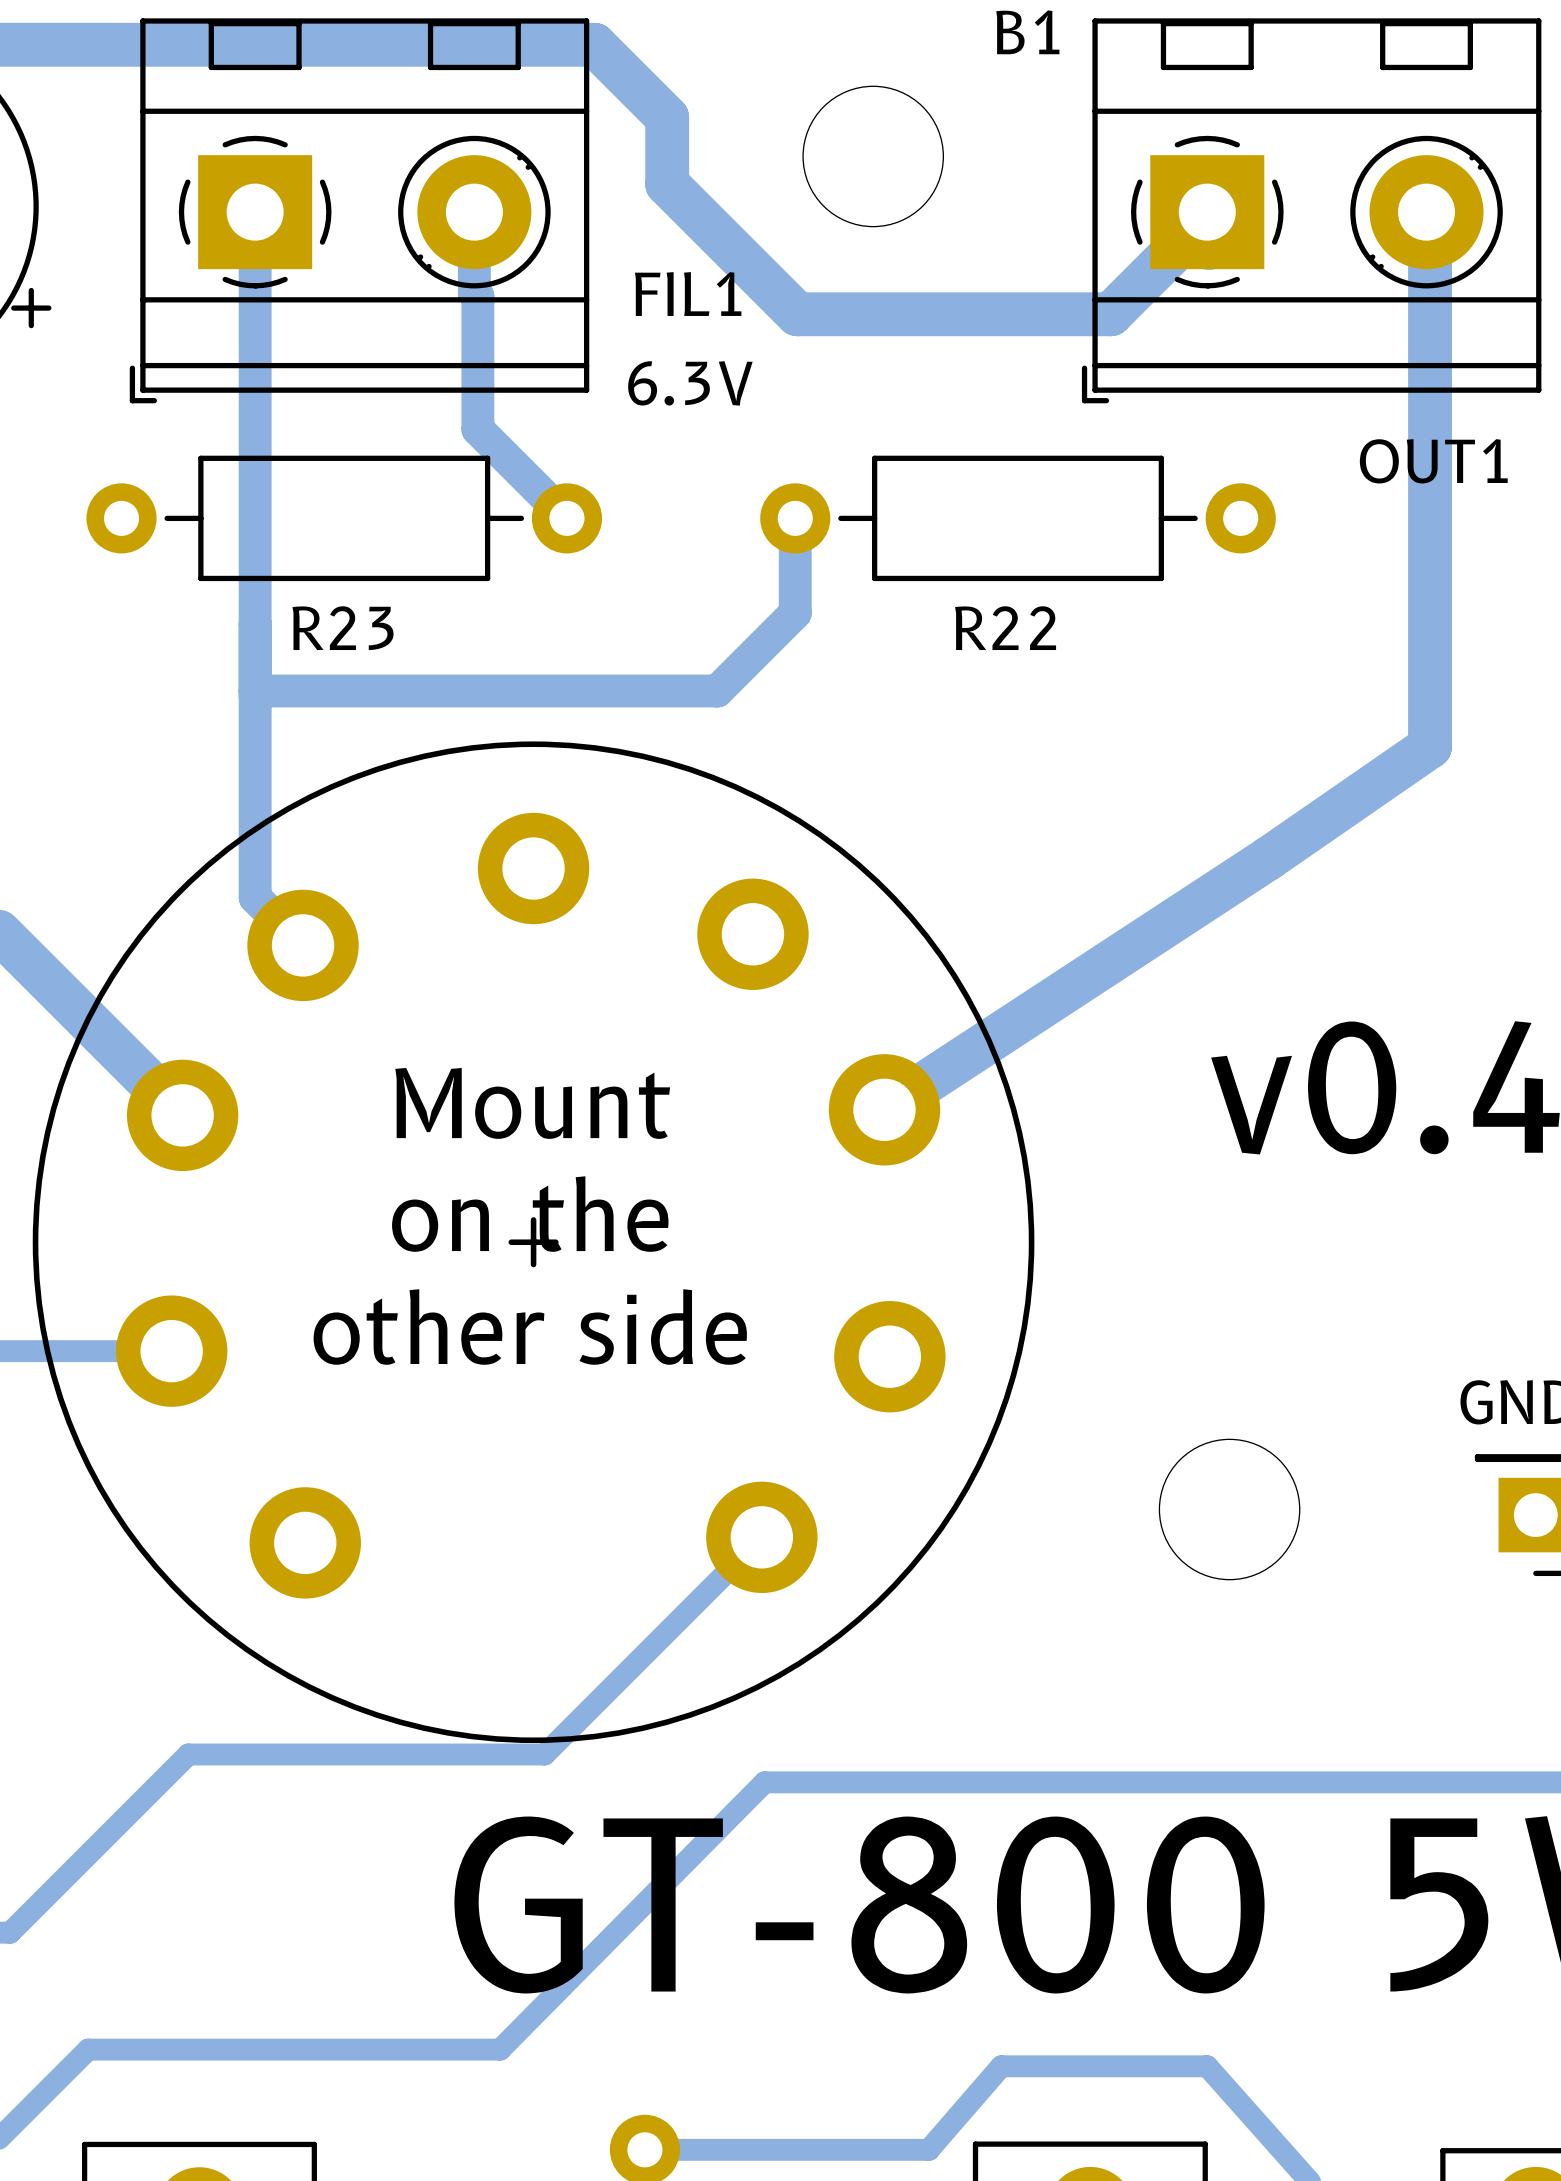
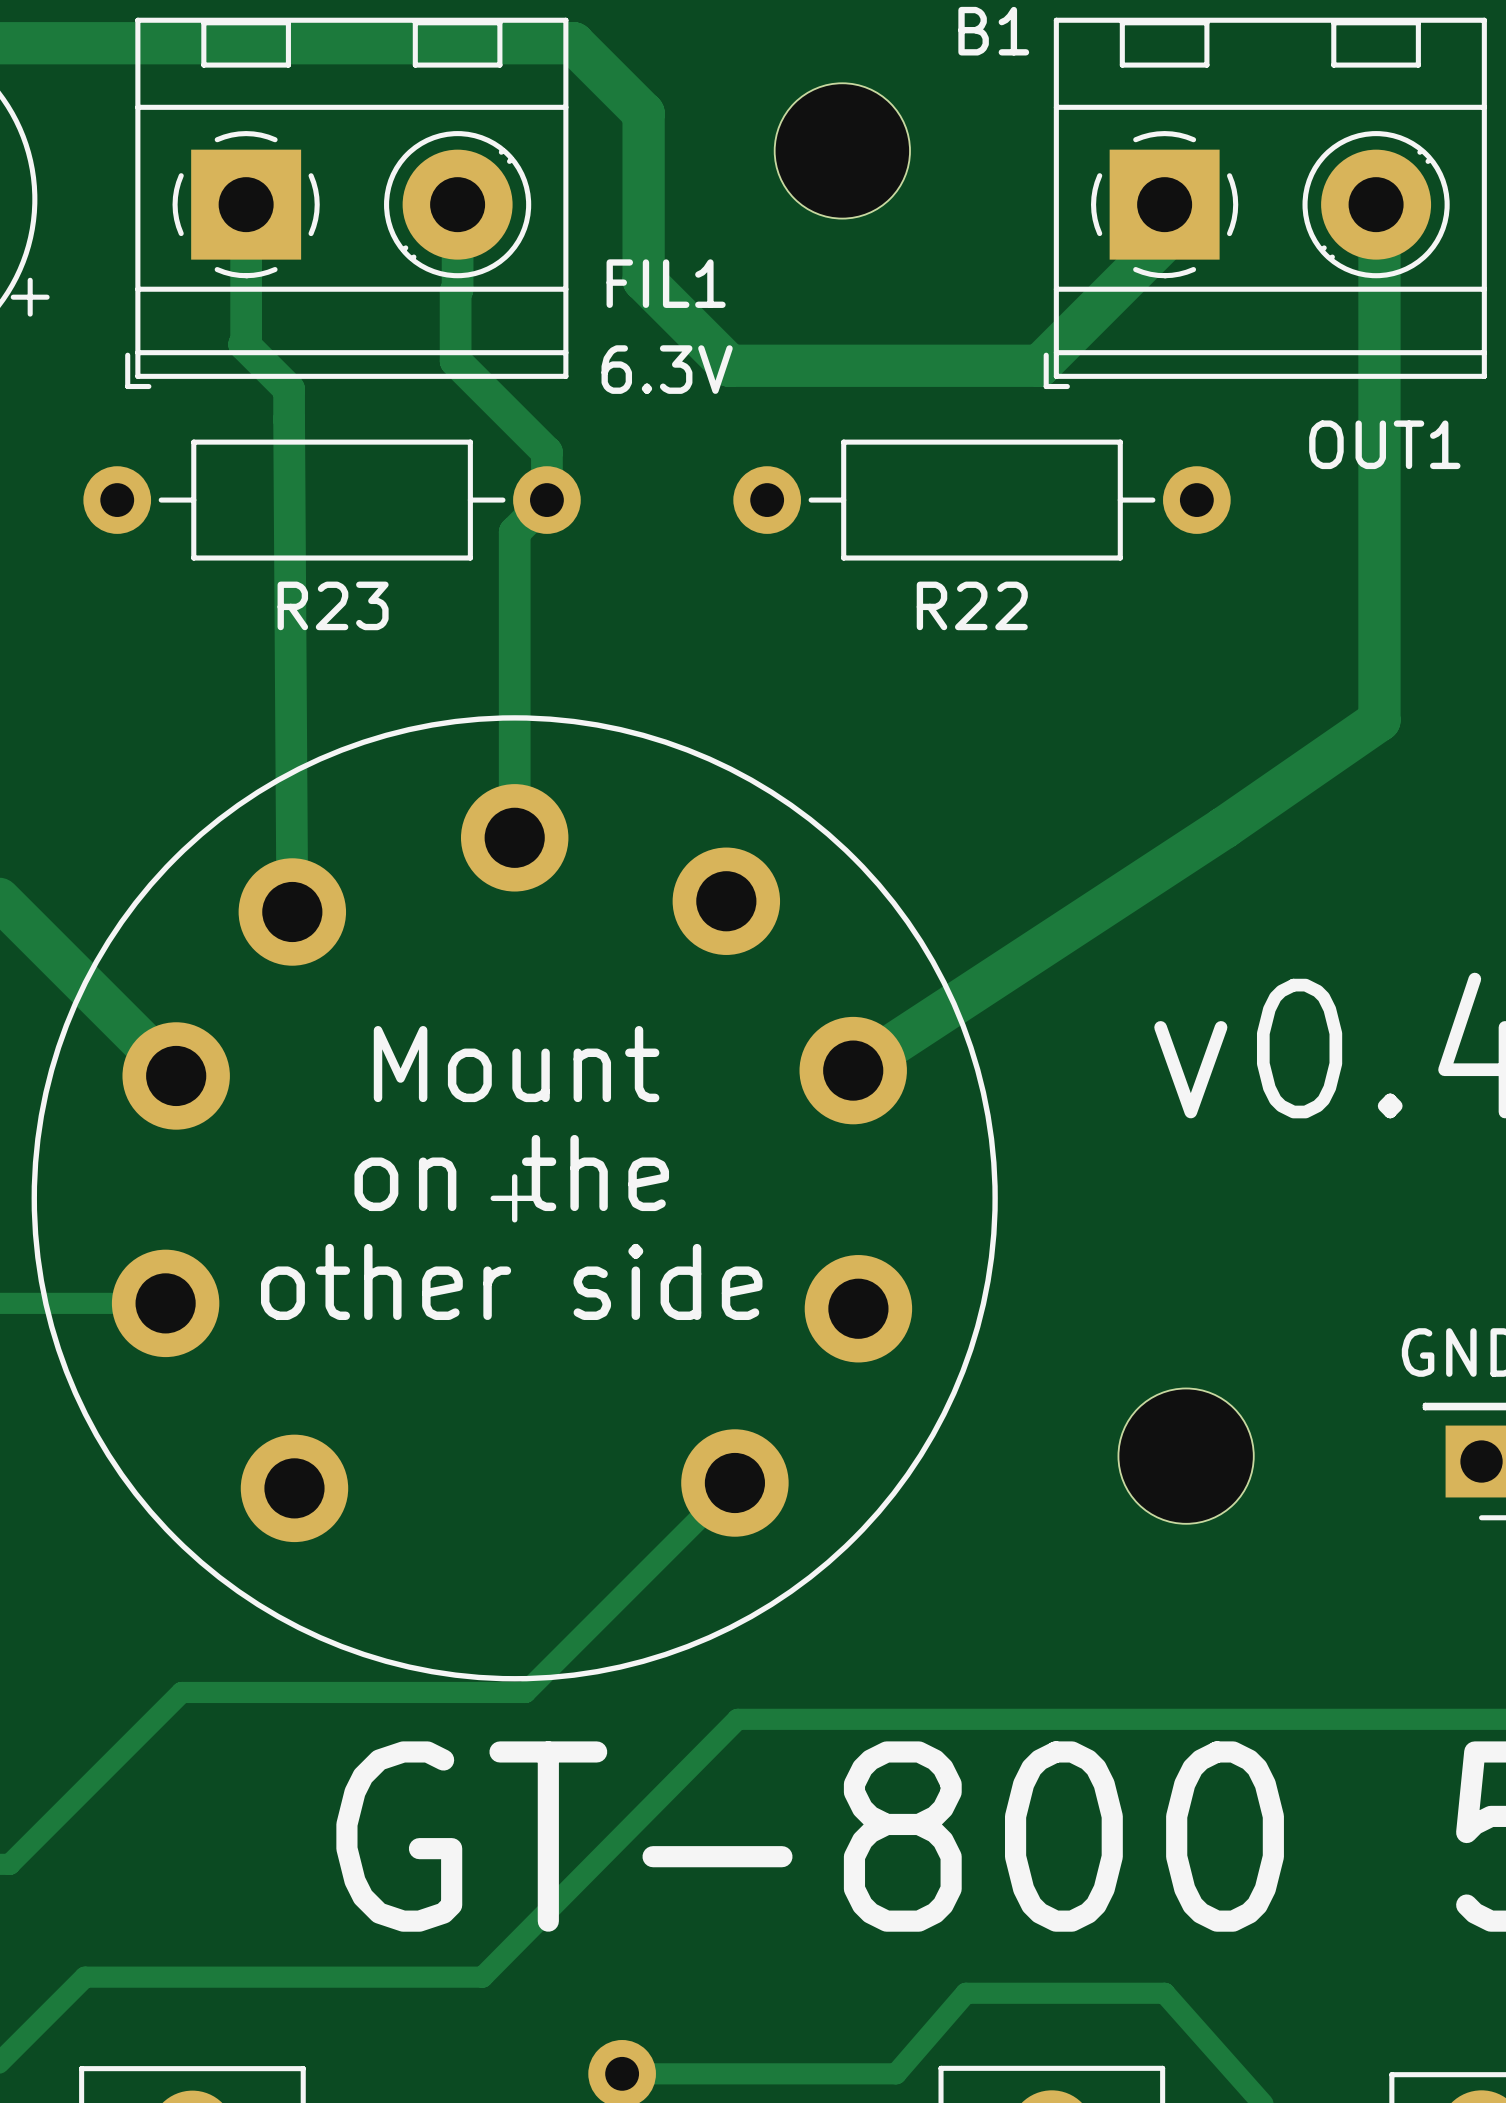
track: (667, 184) (797, 314) (1110, 314) (1207, 217) (1207, 212) -> (643, 177) (643, 279) (729, 365) (1039, 365) (1166, 239)
track: (474, 292) (477, 296) (477, 429) (566, 518) -> (457, 282) (457, 289) (455, 291) (455, 360) (546, 452) (546, 500) (514, 532) (514, 837)
track: (255, 355) (255, 897) (303, 945) -> (246, 342) (244, 344) (289, 389) (292, 912)
track: (795, 518) (795, 613) (717, 691) (255, 691) -> none

